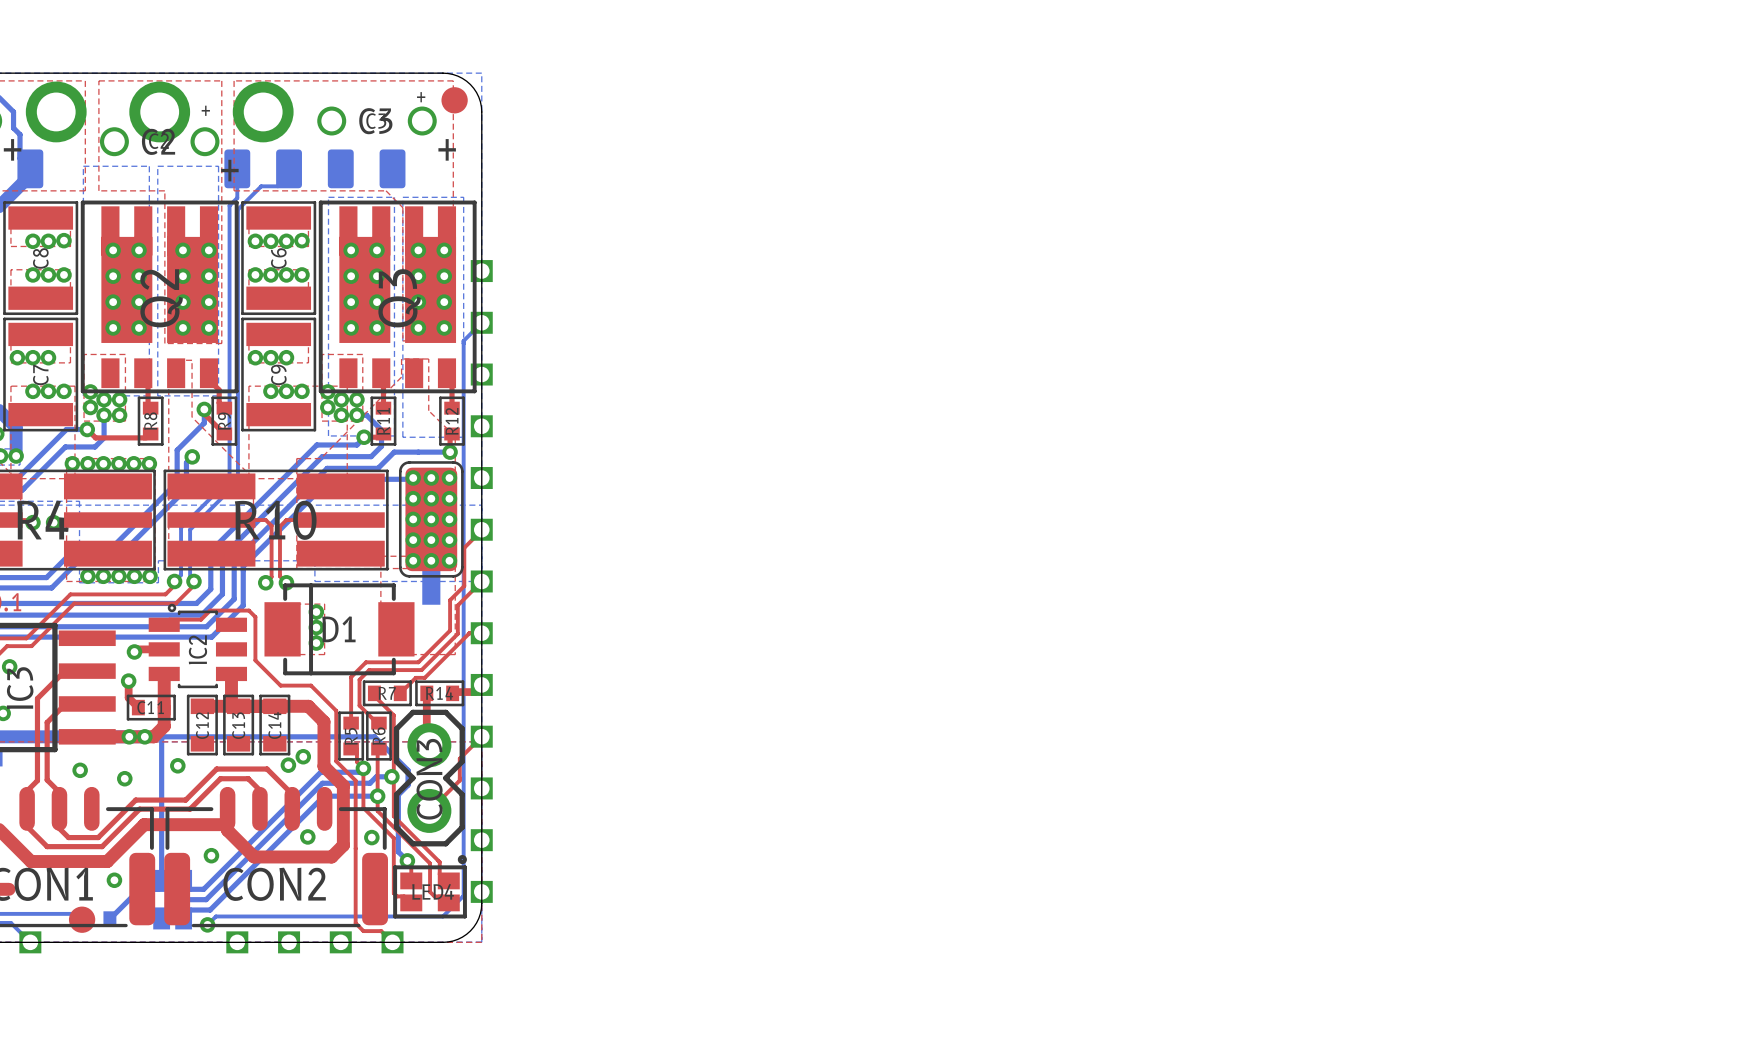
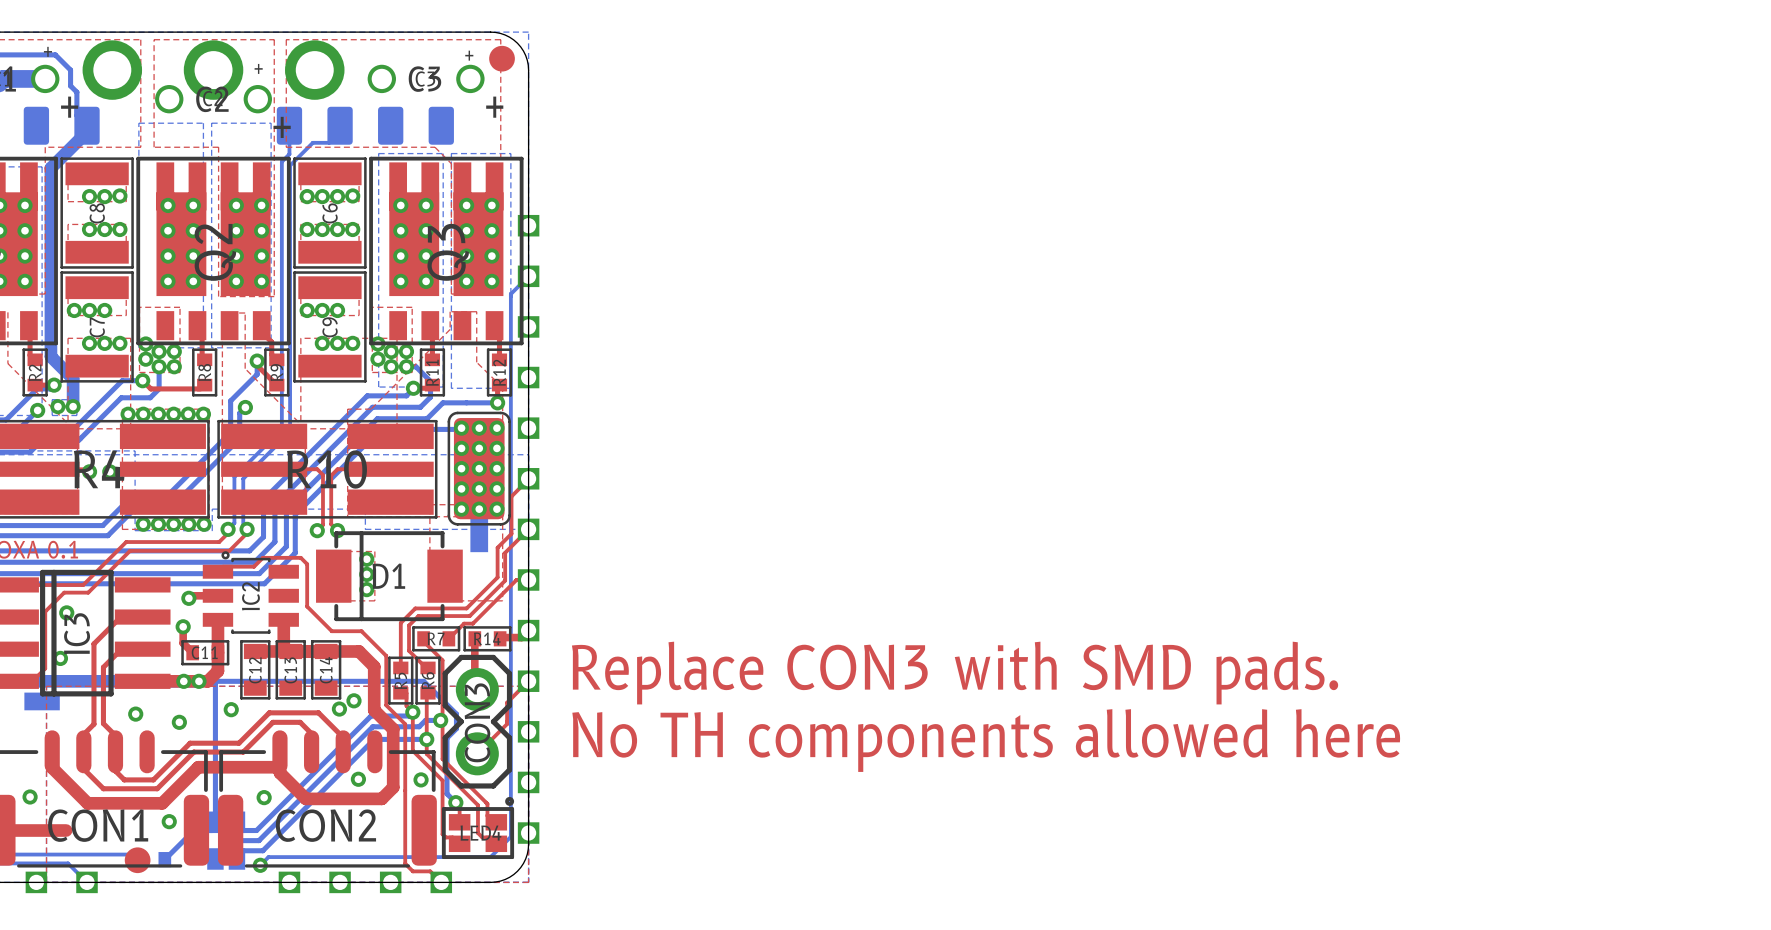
text: none -> Replace CON3 with SMD pads. (955, 673)
text: none -> No TH components allowed here (986, 740)

